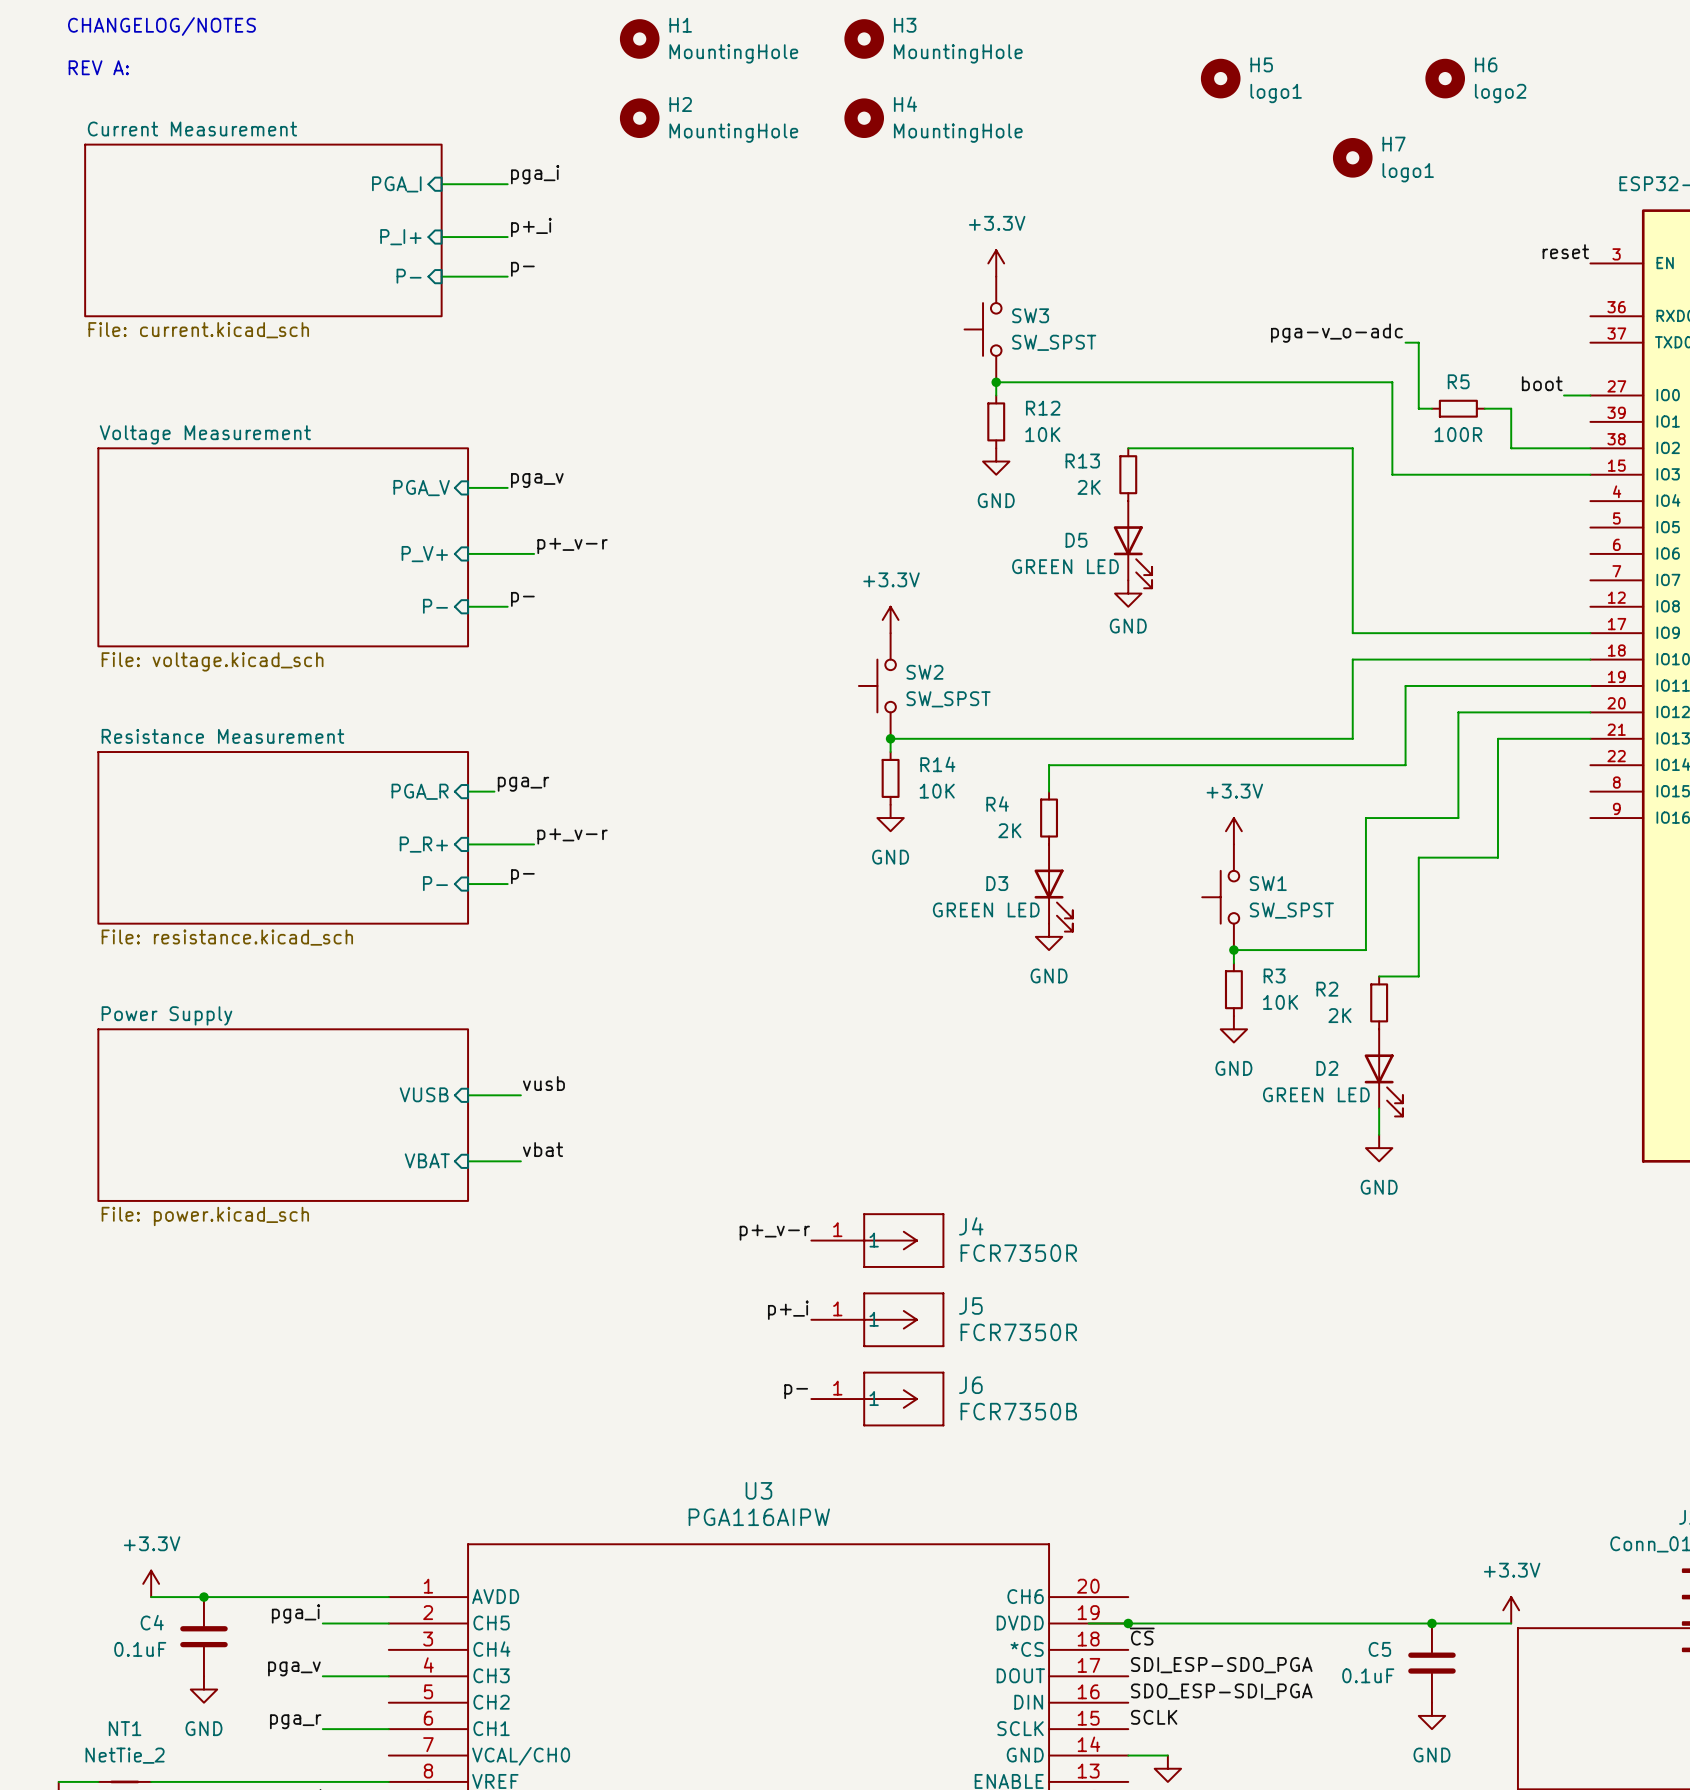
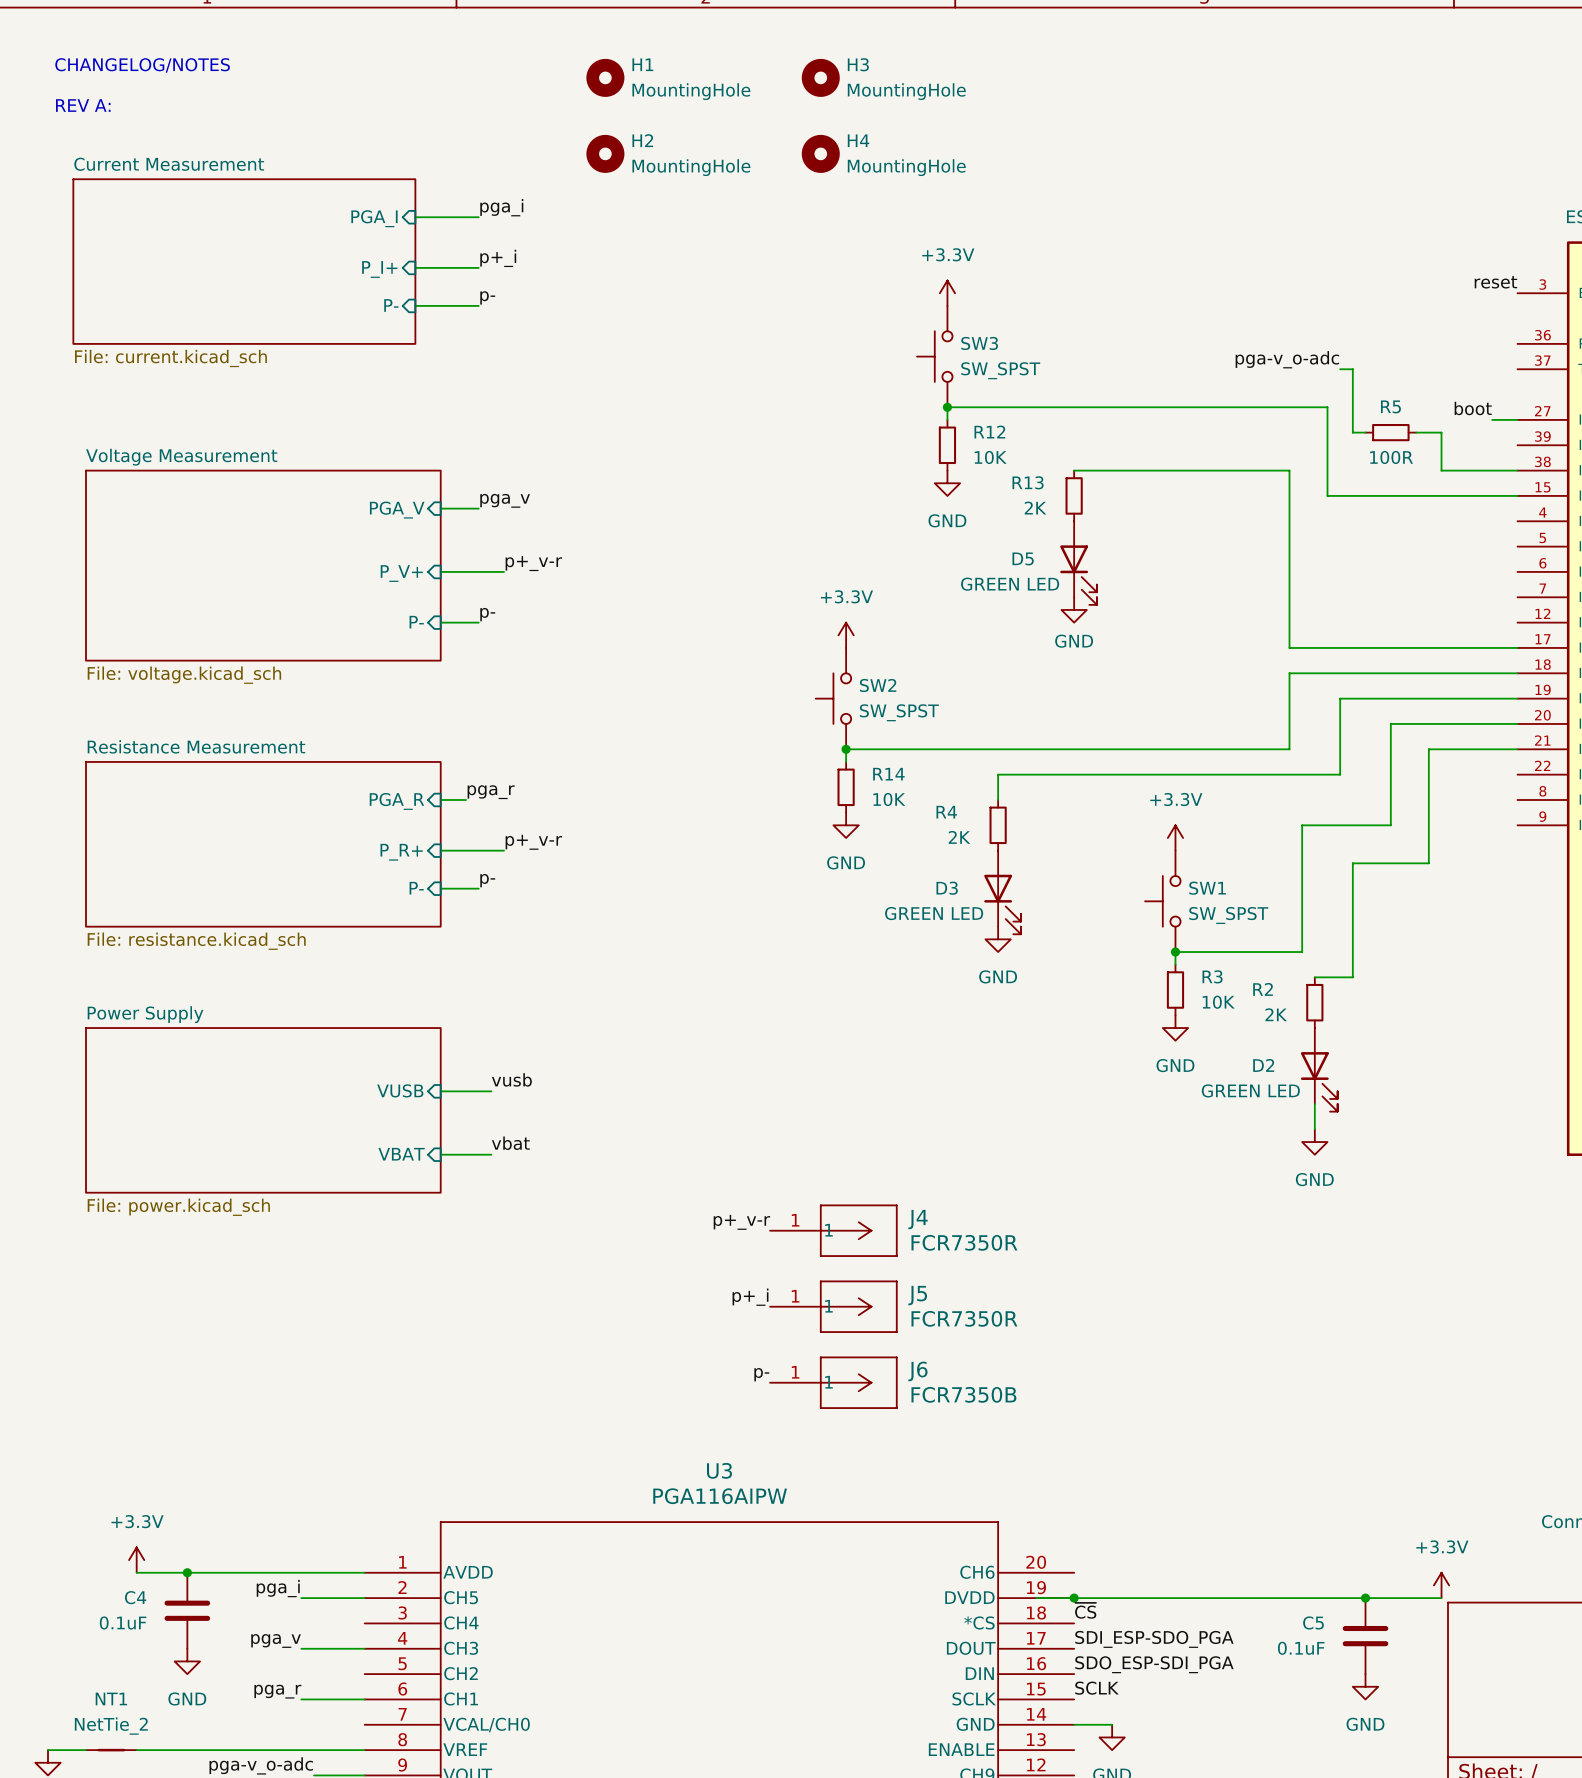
H5: logo1 (1220, 78) -> none
H6: logo2 (1445, 78) -> none
H7: logo1 (1352, 157) -> none

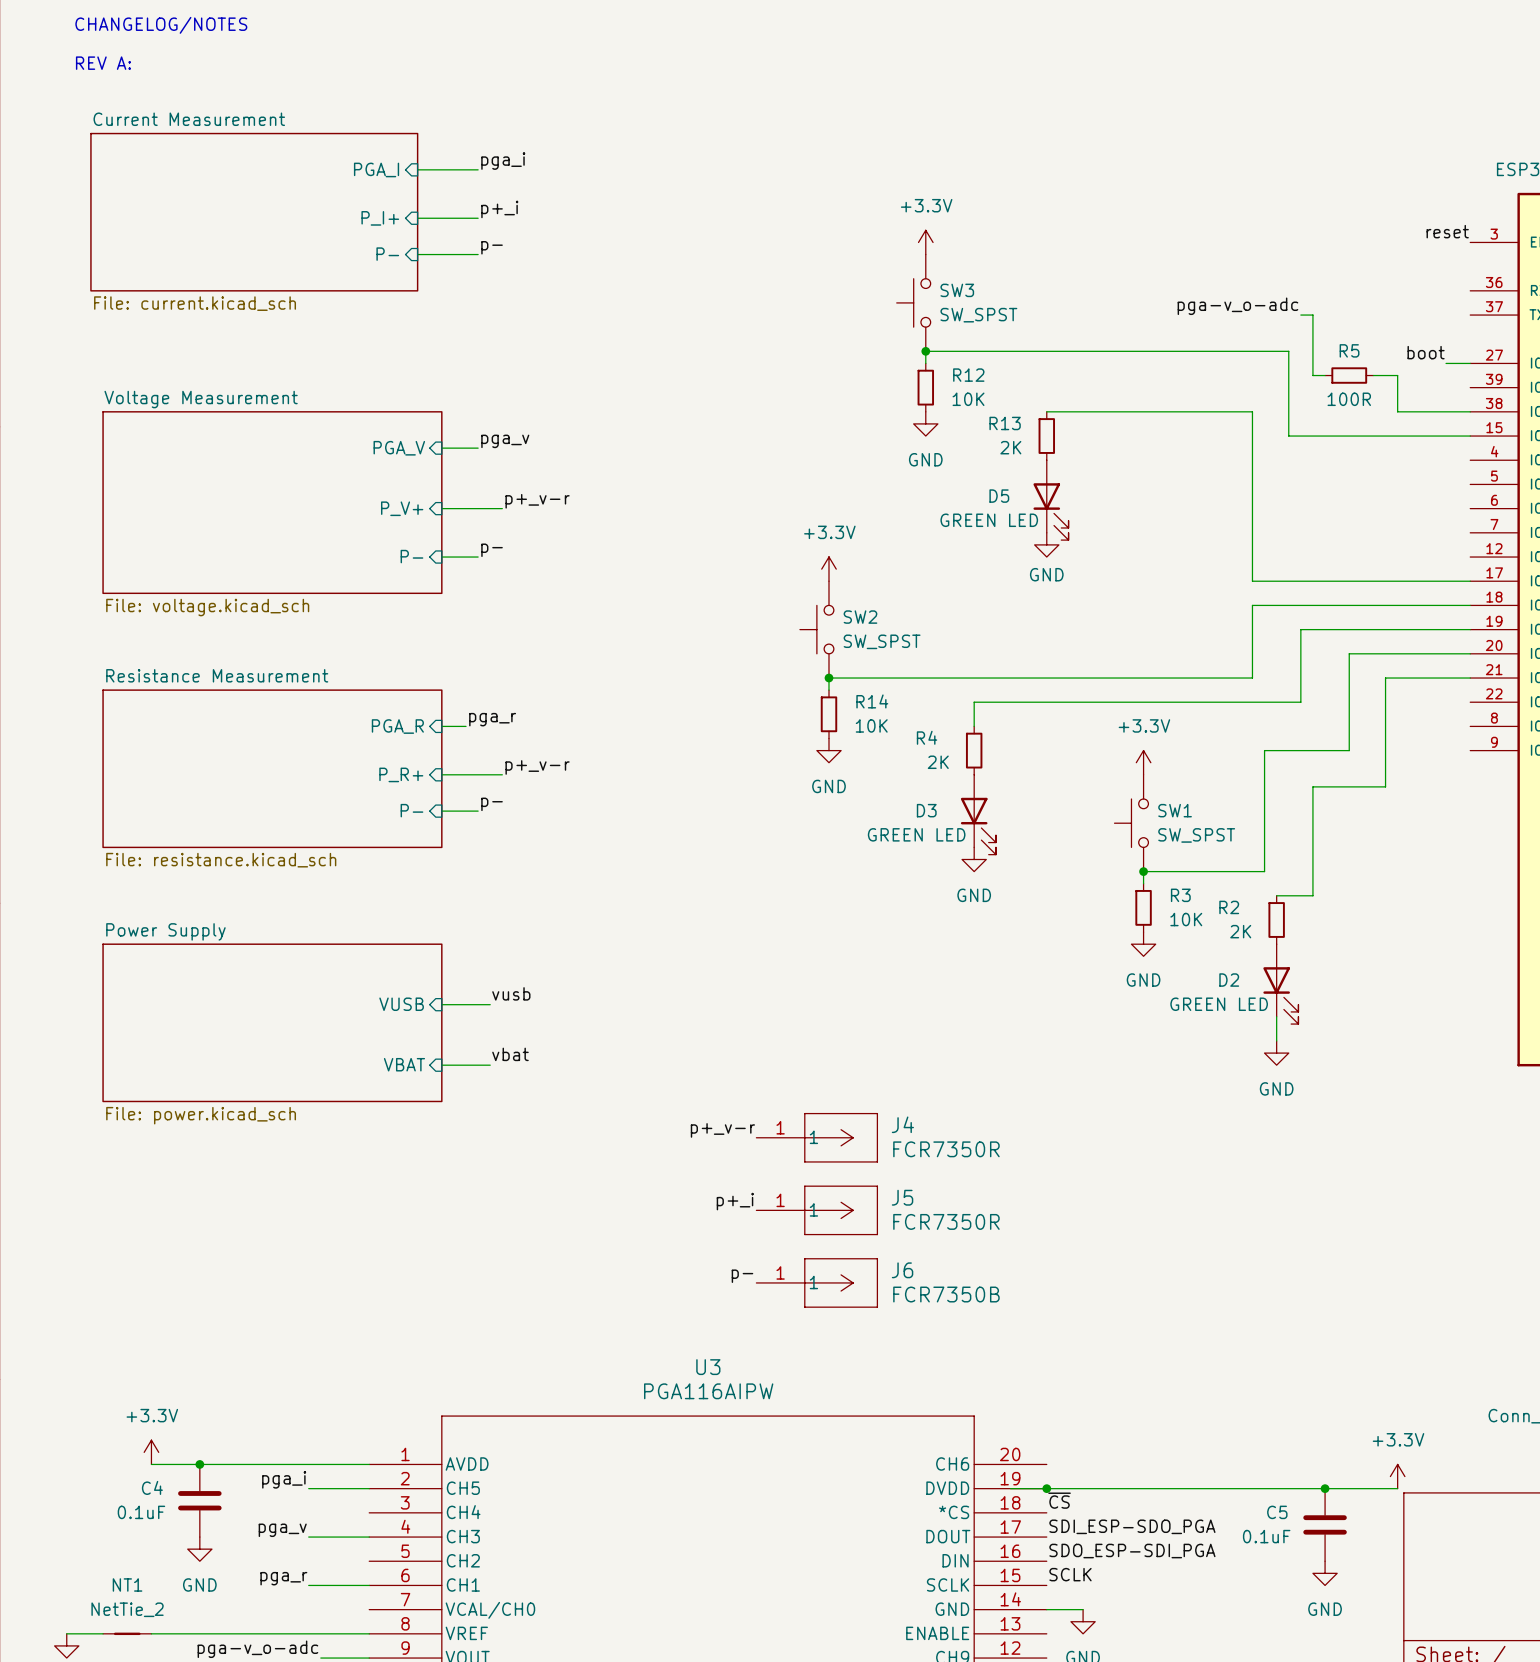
H1: MountingHole (605, 77) -> none
H3: MountingHole (820, 77) -> none
H2: MountingHole (605, 153) -> none
H4: MountingHole (820, 153) -> none

